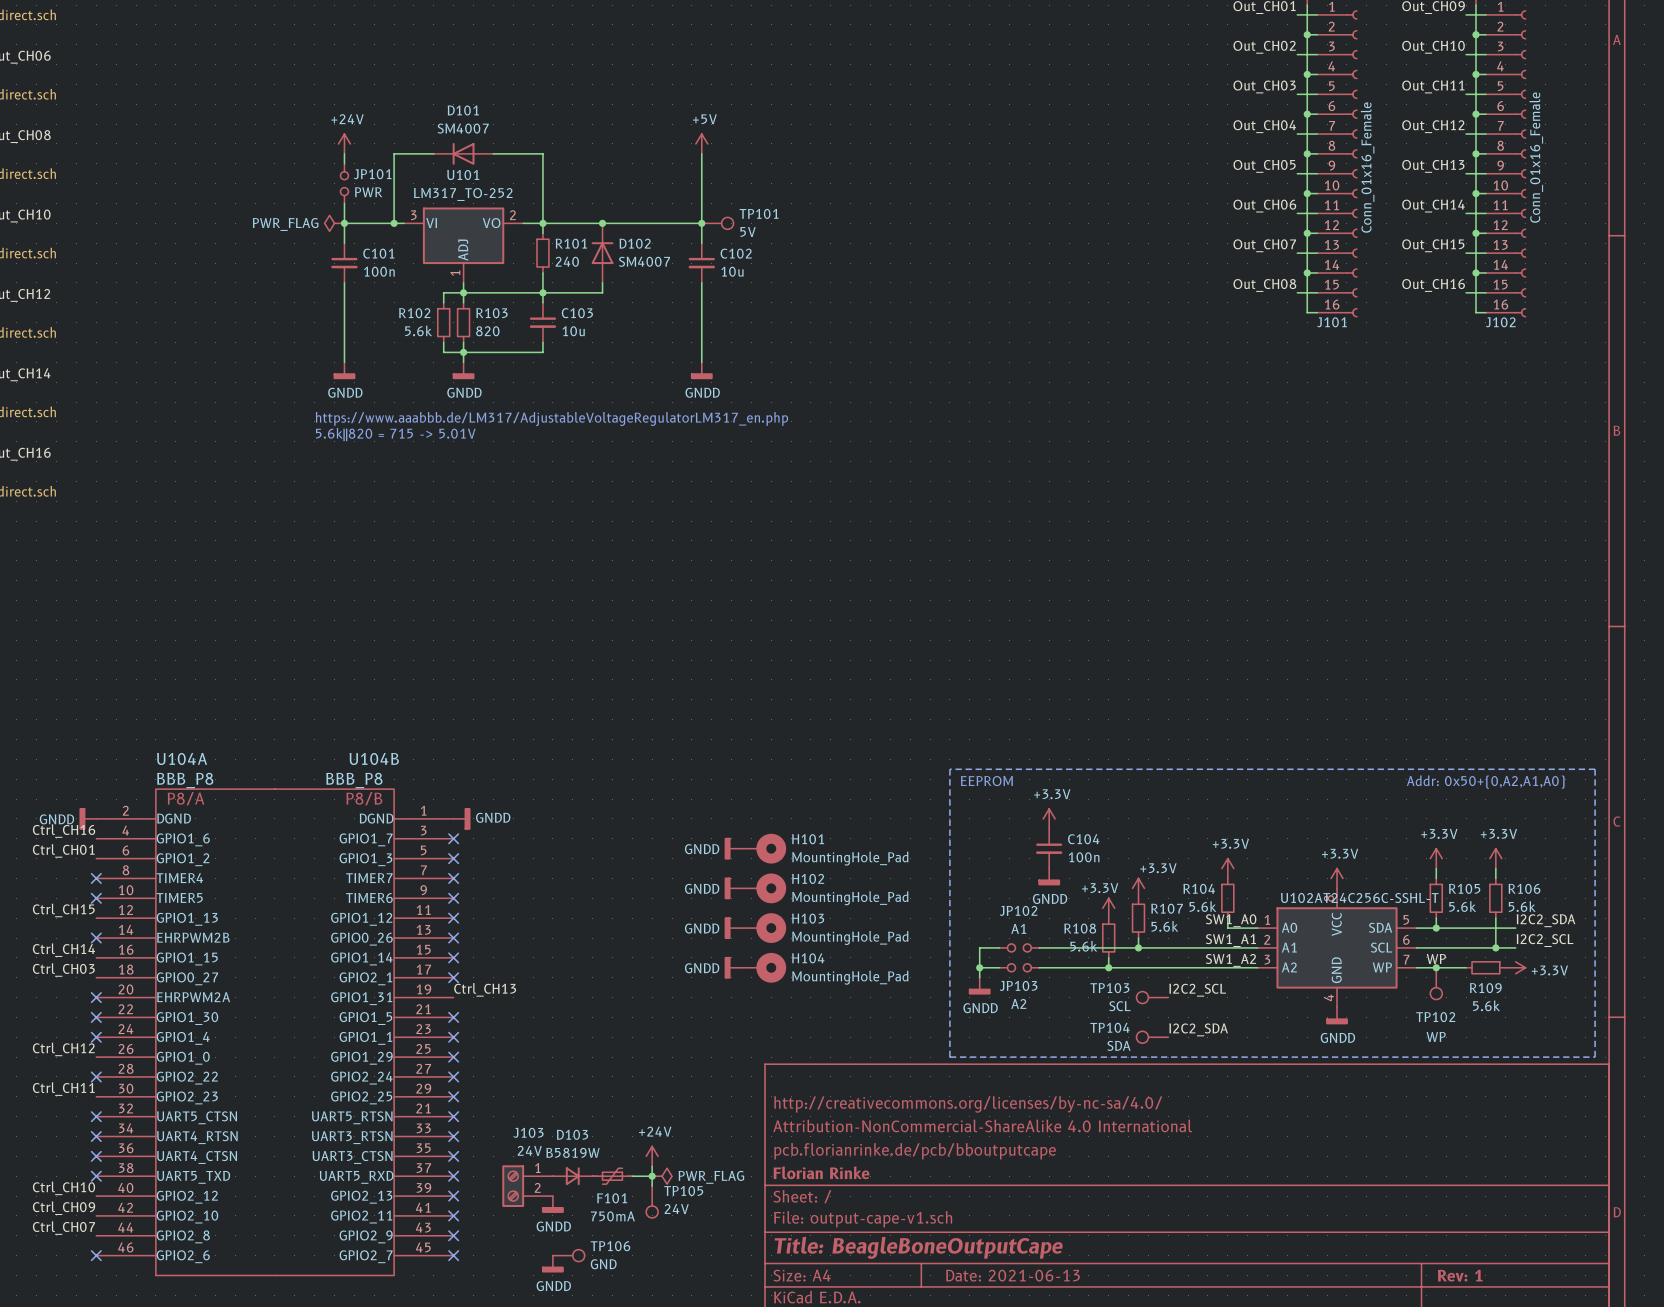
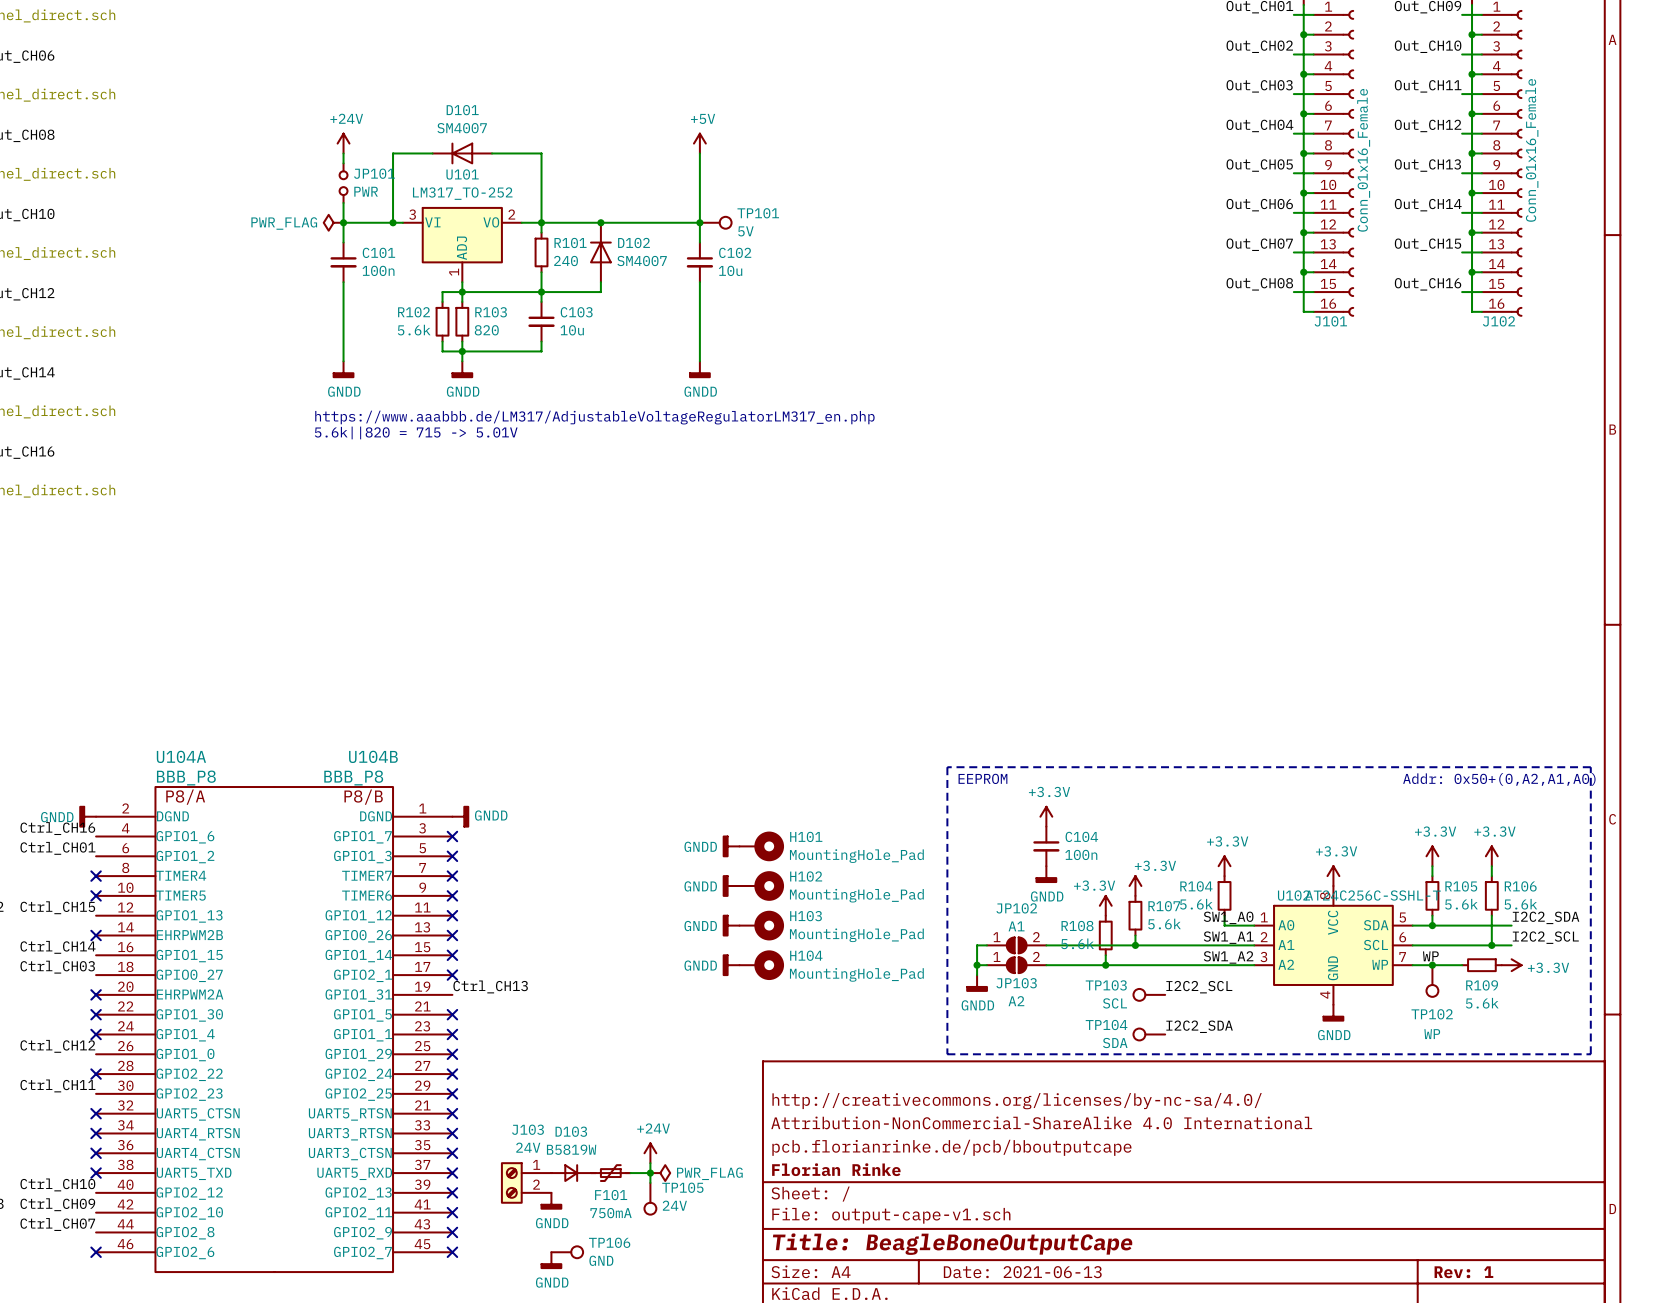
JP102 symbol: [999, 943, 1040, 952] -> [986, 937, 1047, 954]
JP103 symbol: [999, 963, 1040, 972] -> [986, 957, 1047, 974]

